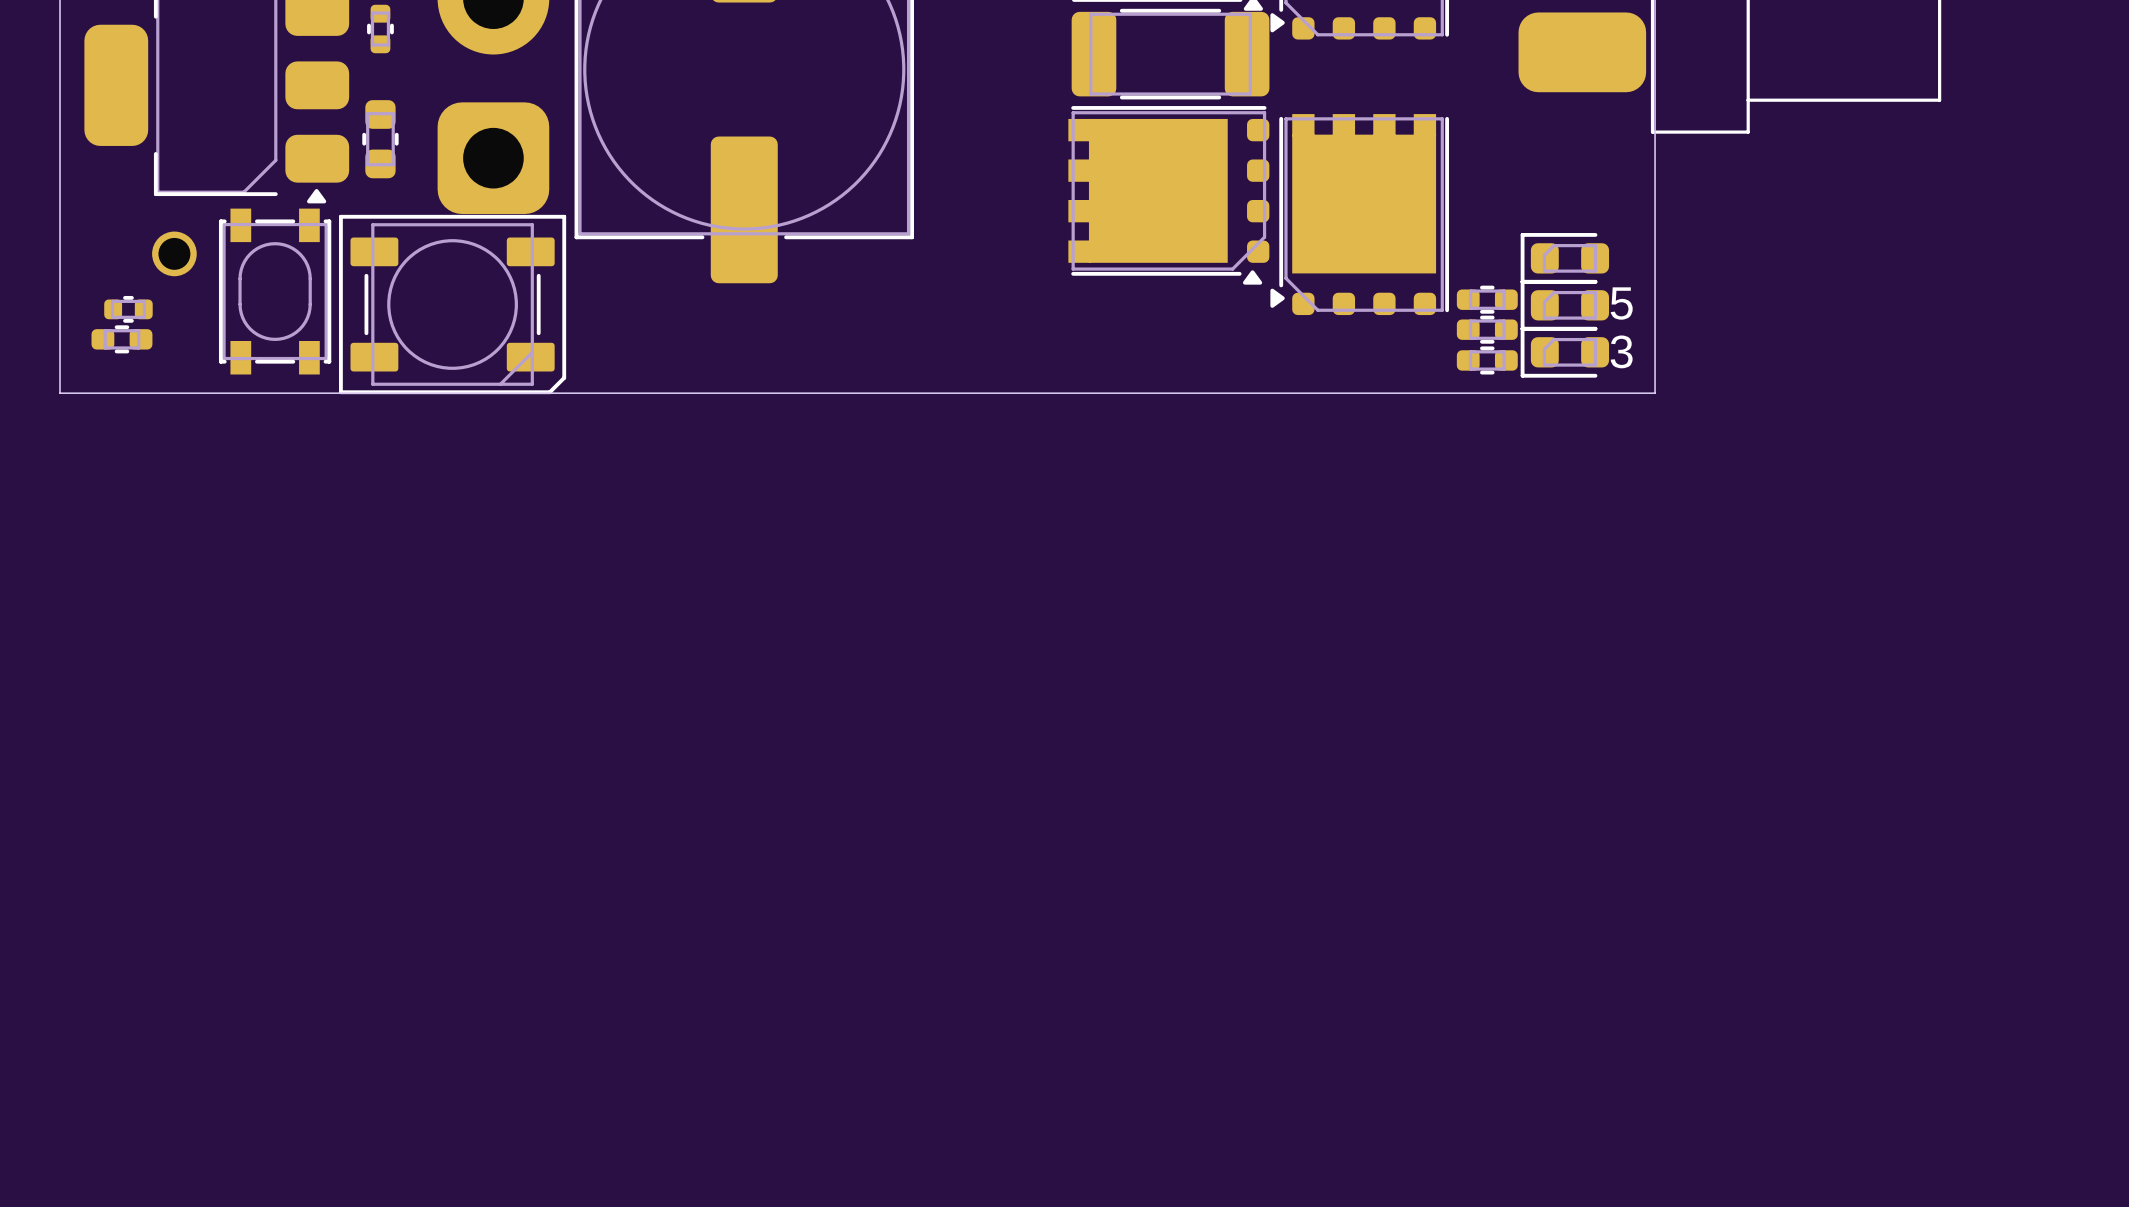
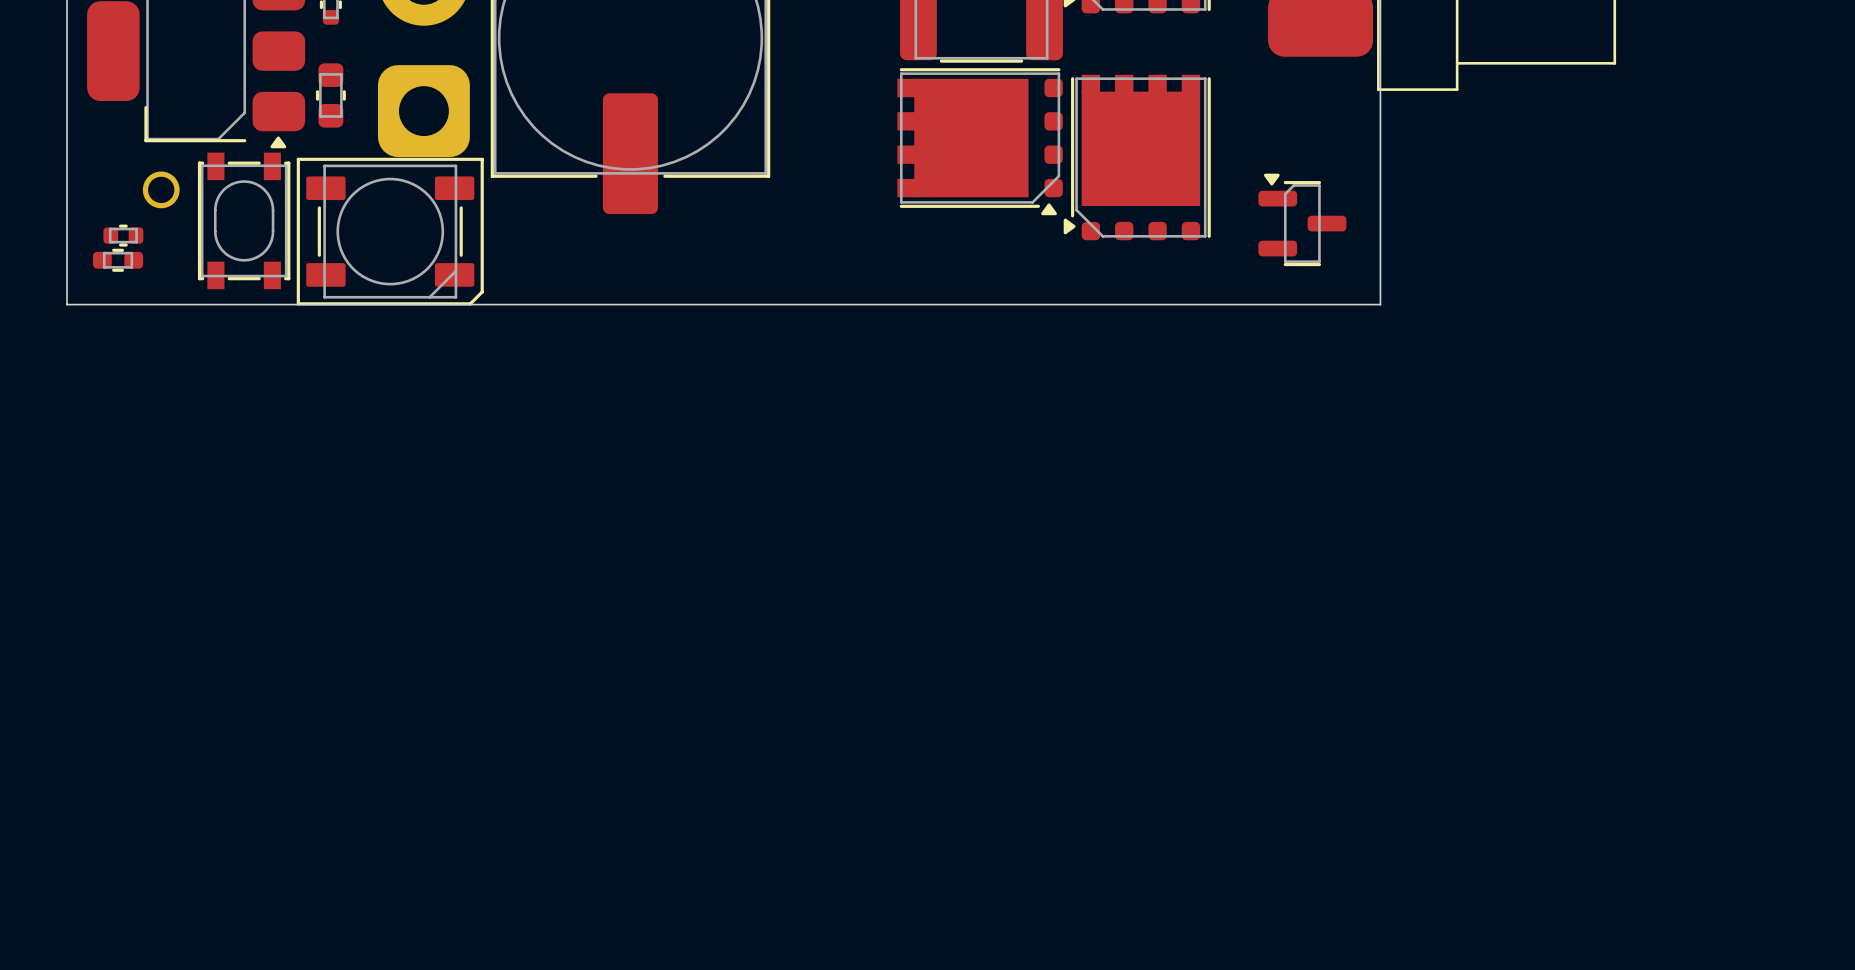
part: (1564, 258) -> none
part footprint: [1520, 279, 1610, 331] -> [1258, 173, 1347, 267]
part: (1487, 299) -> none
text: 5 (1621, 303) -> none
part: (1487, 329) -> none
text: 3 (1621, 351) -> none
part: (1564, 352) -> none
part: (1487, 360) -> none

